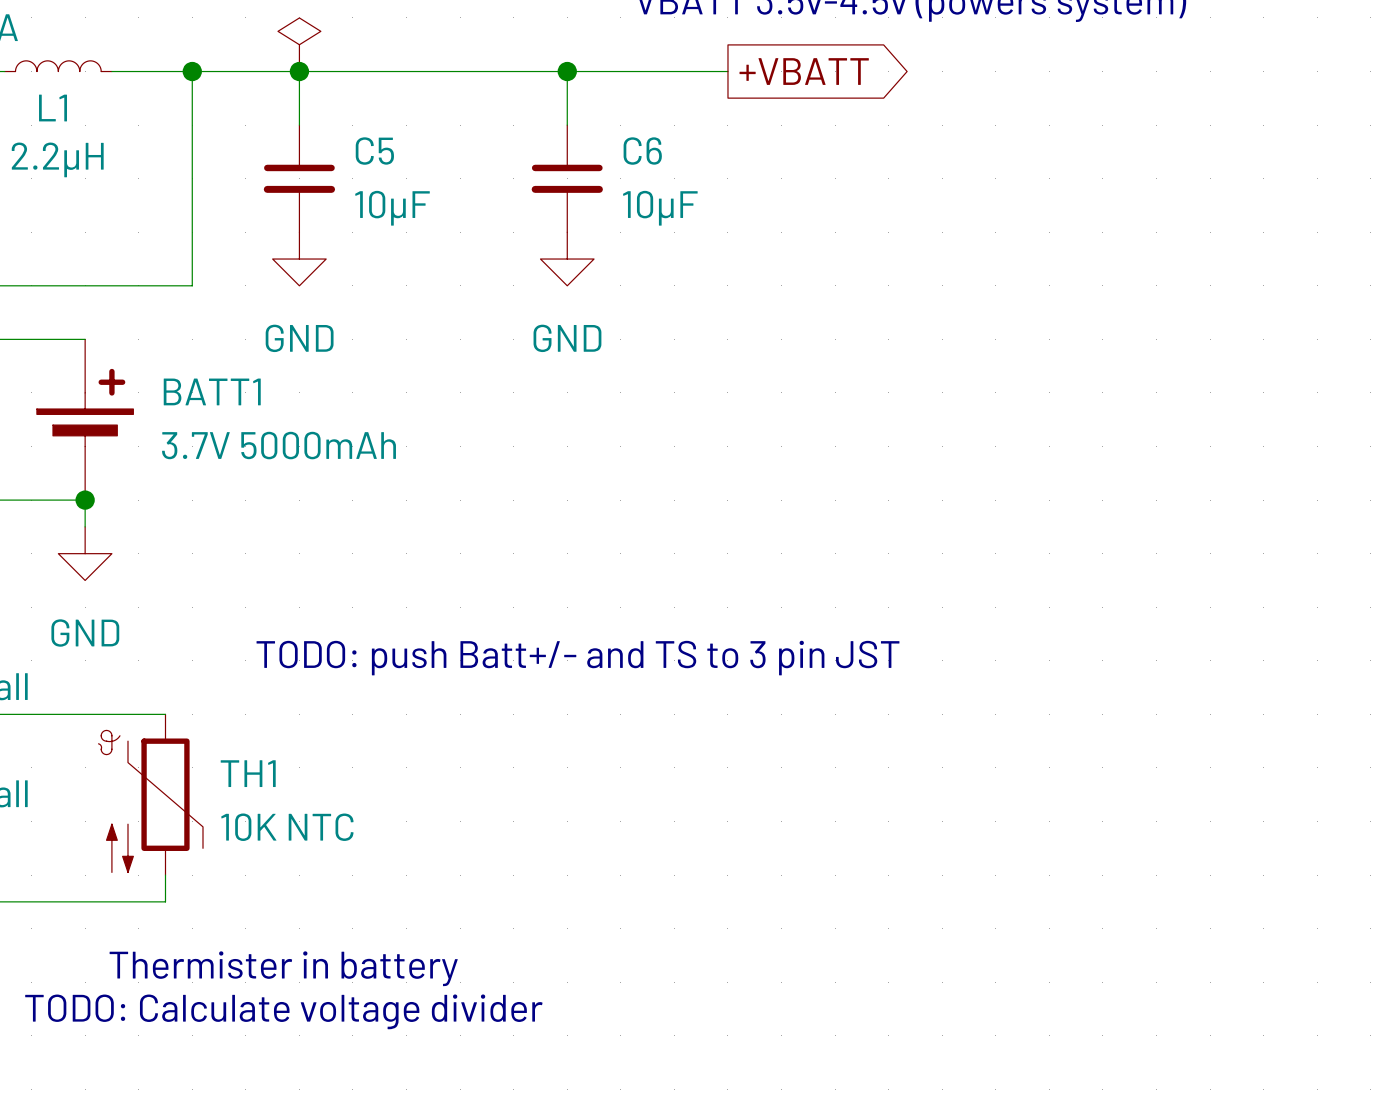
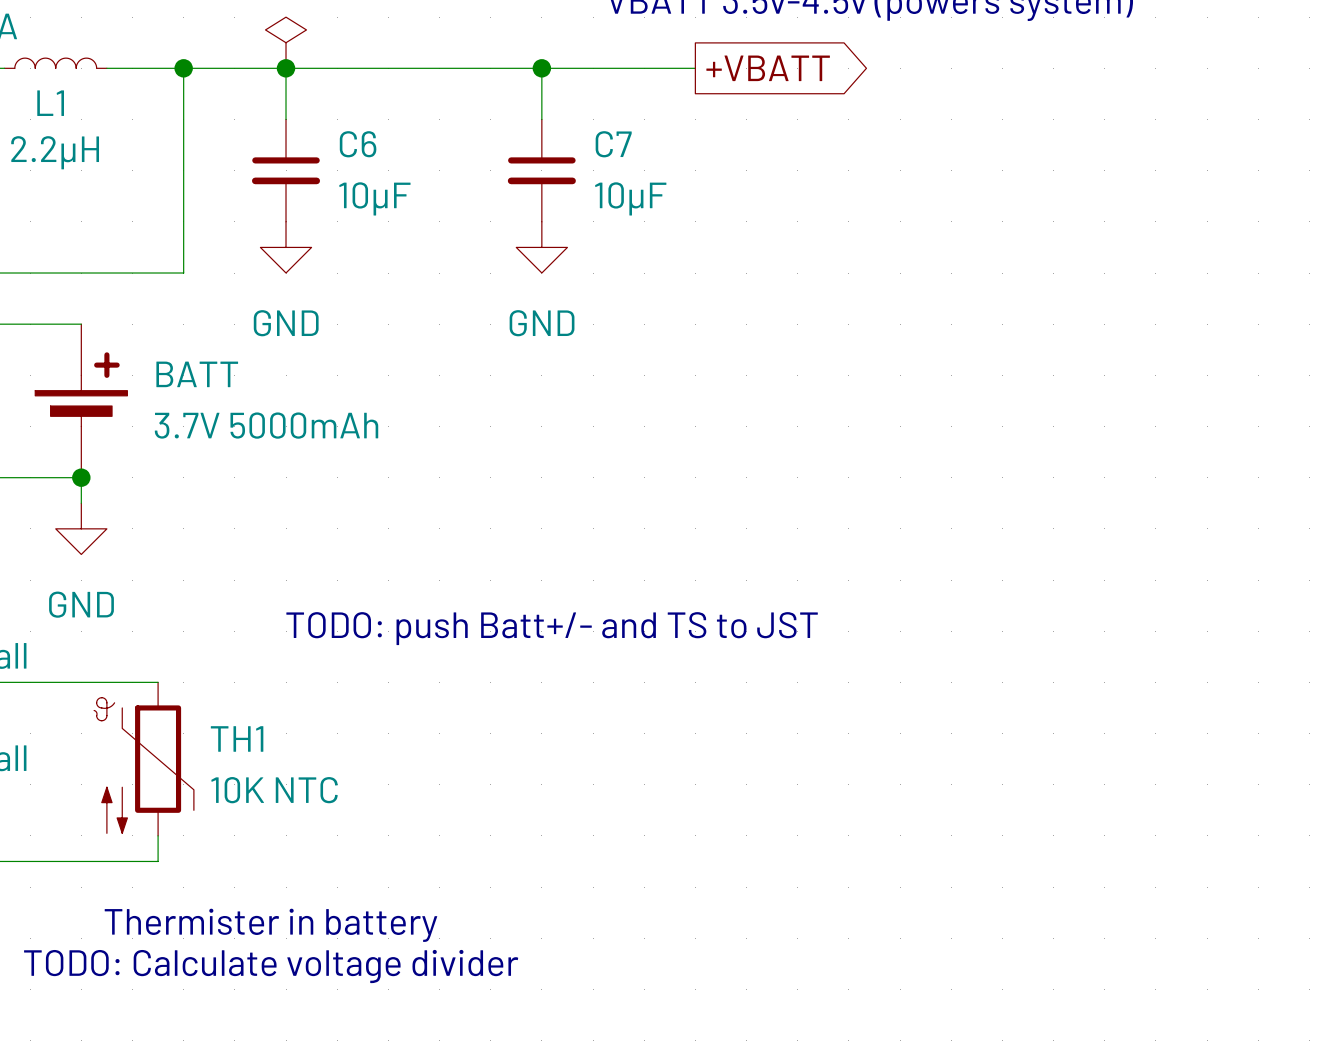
C5 name: C5 (374, 151) -> C6 (358, 144)
C6 name: C6 (642, 151) -> C7 (613, 144)
BATT1 name: BATT1 (212, 391) -> BATT (197, 374)
text: TODO: push Batt+/- and TS to 3 pin JST (577, 658) -> TODO: push Batt+/- and TS to JST (552, 628)

